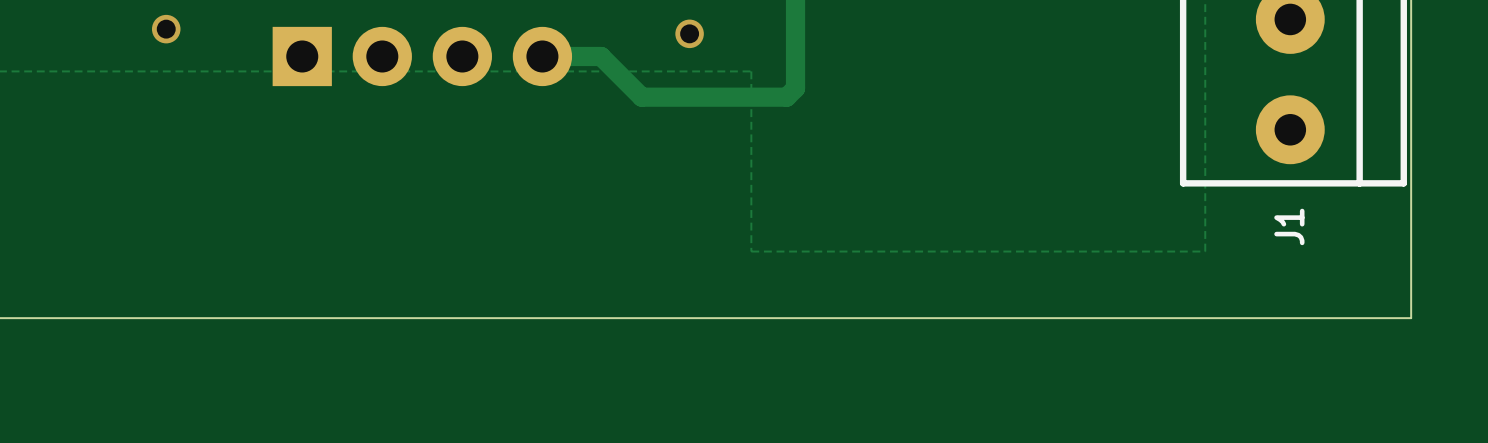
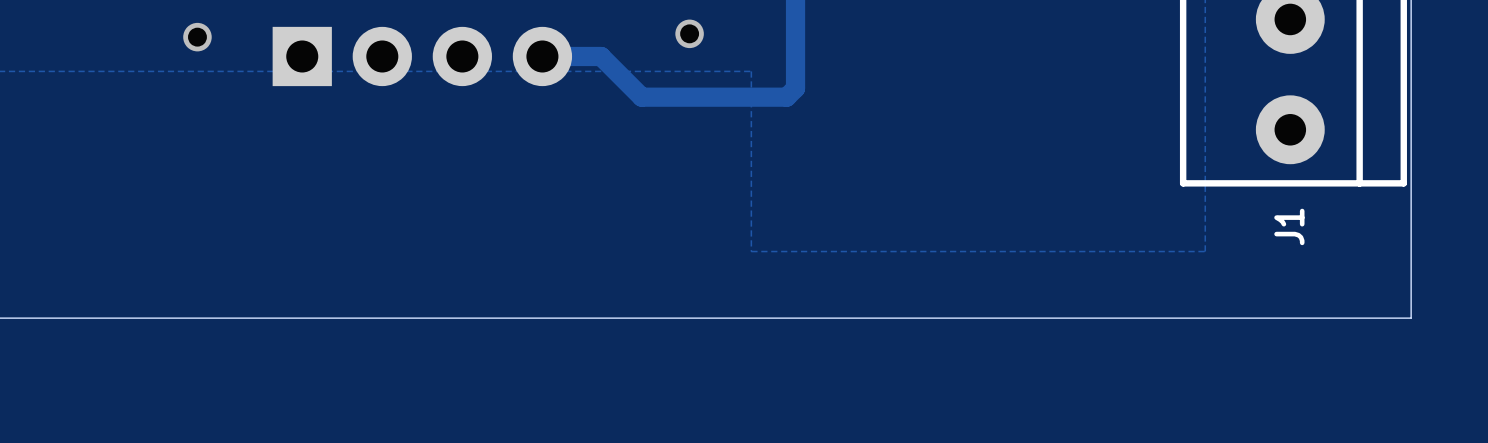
via position: (166, 29) -> (197, 37)

